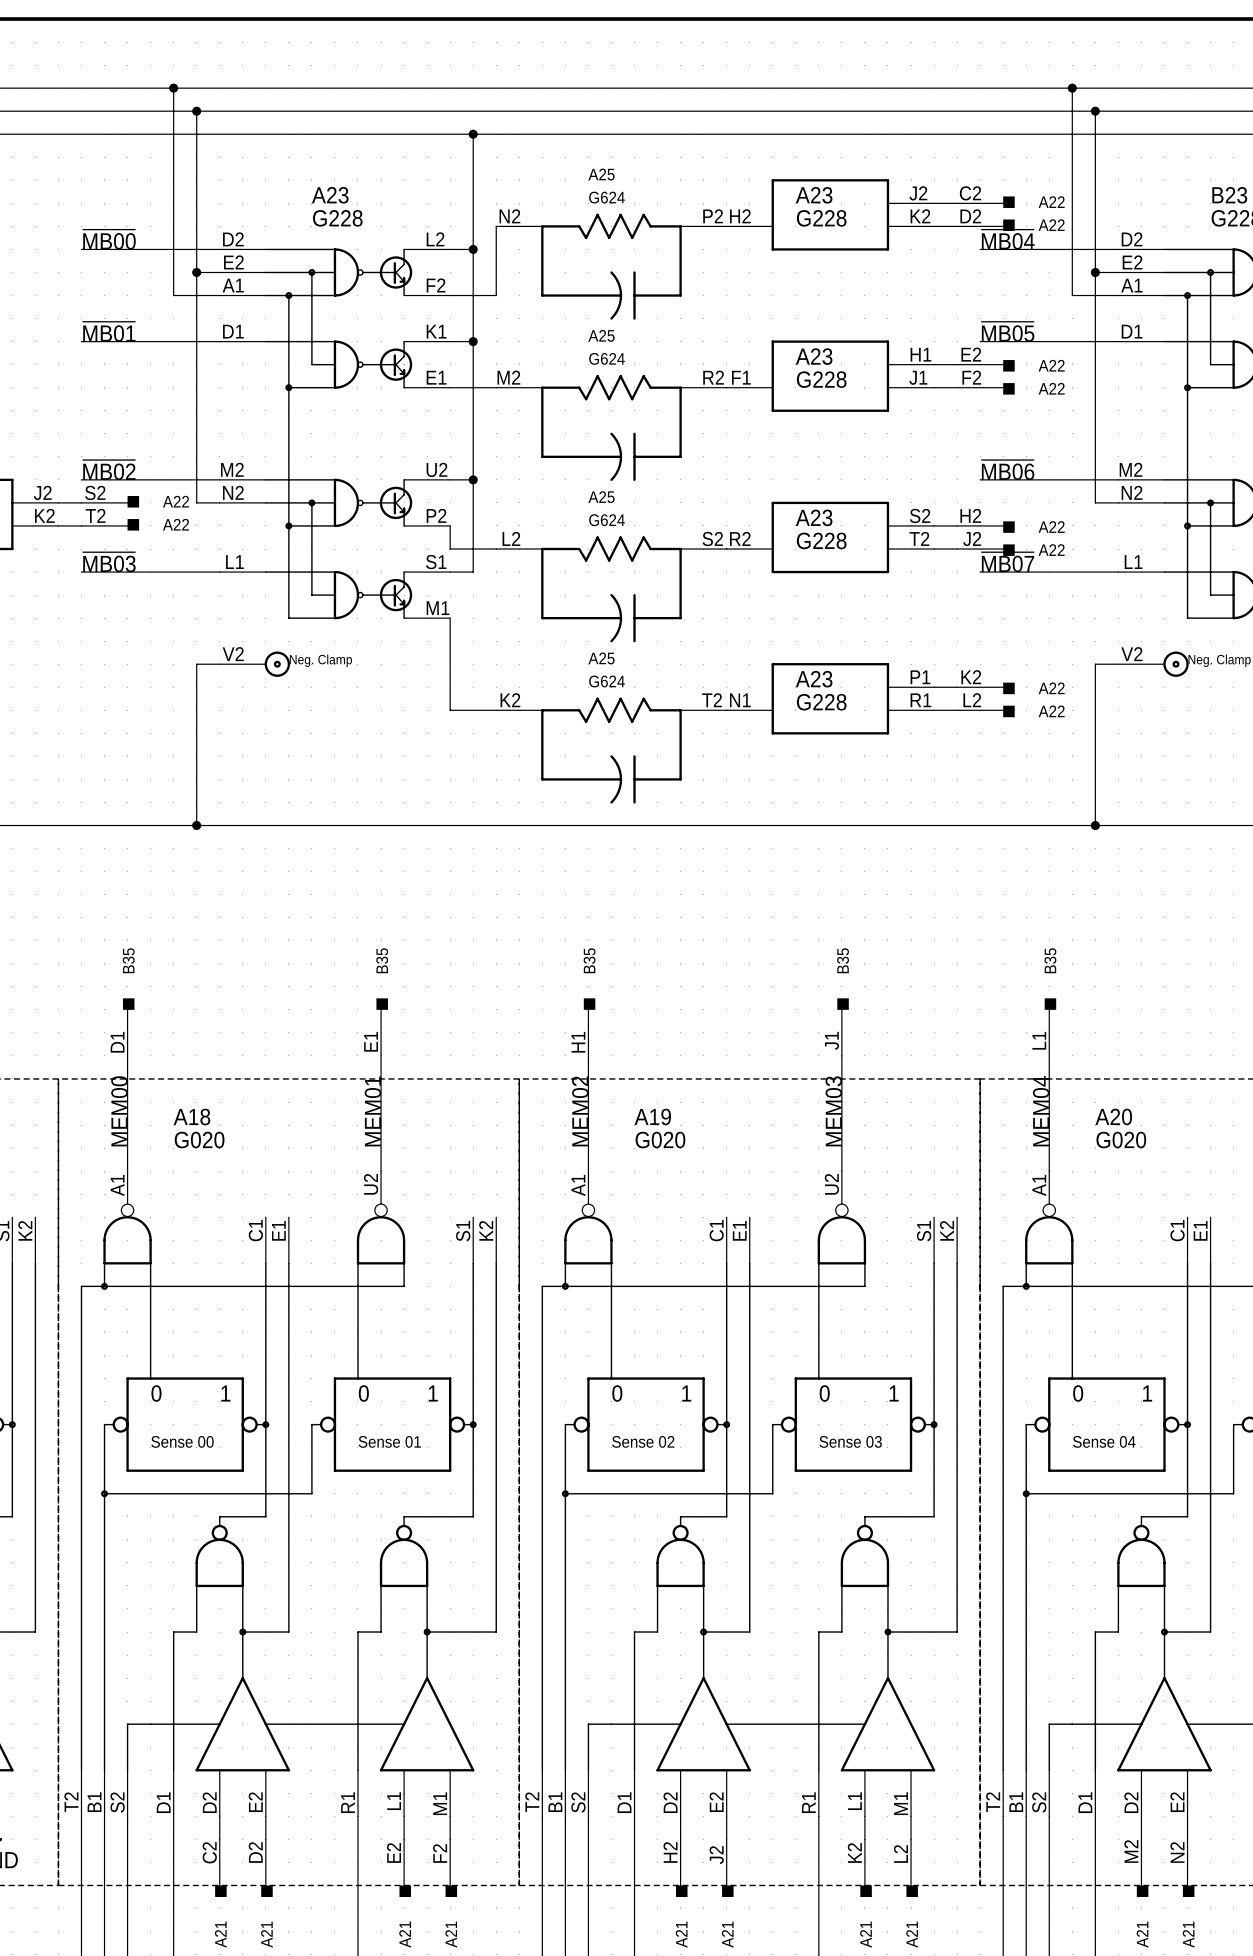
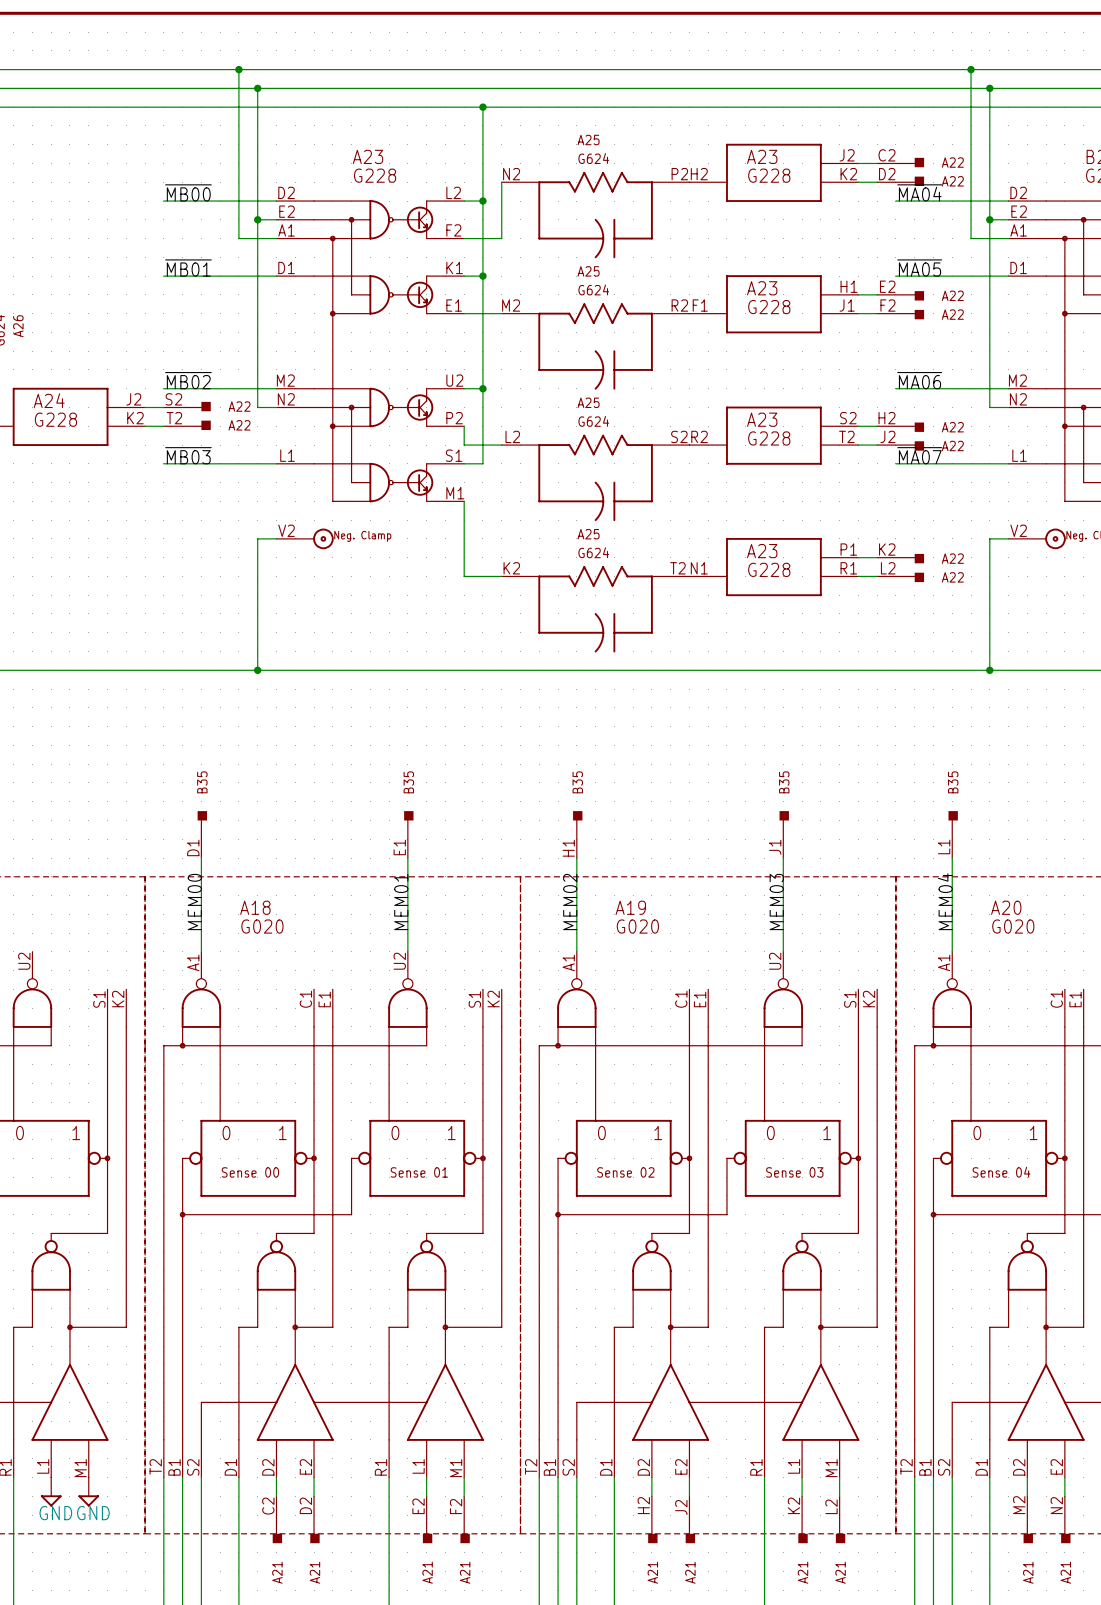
label: ~{MB04} (1008, 239) -> ~{MA04} (919, 192)
label: ~{MB05} (1007, 331) -> ~{MA05} (919, 268)
label: ~{MB06} (1007, 470) -> ~{MA06} (919, 380)
label: ~{MB07} (1007, 562) -> ~{MA07} (919, 455)

